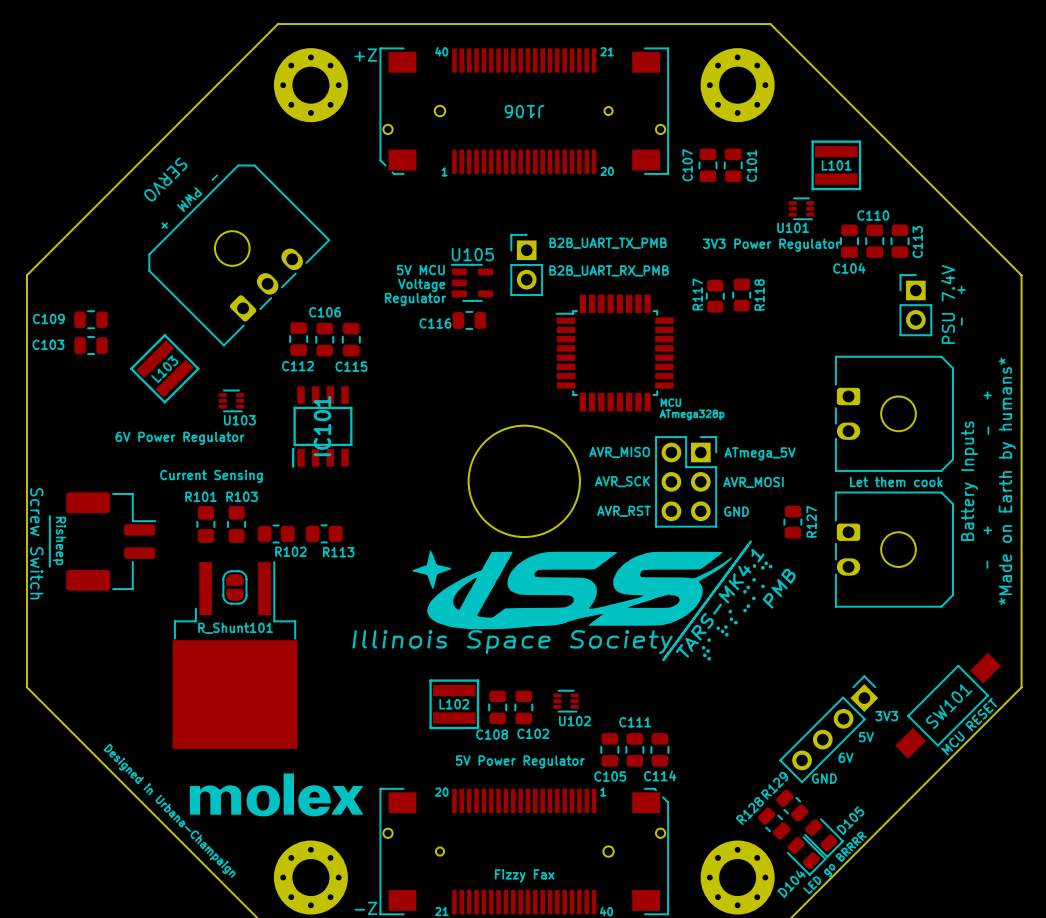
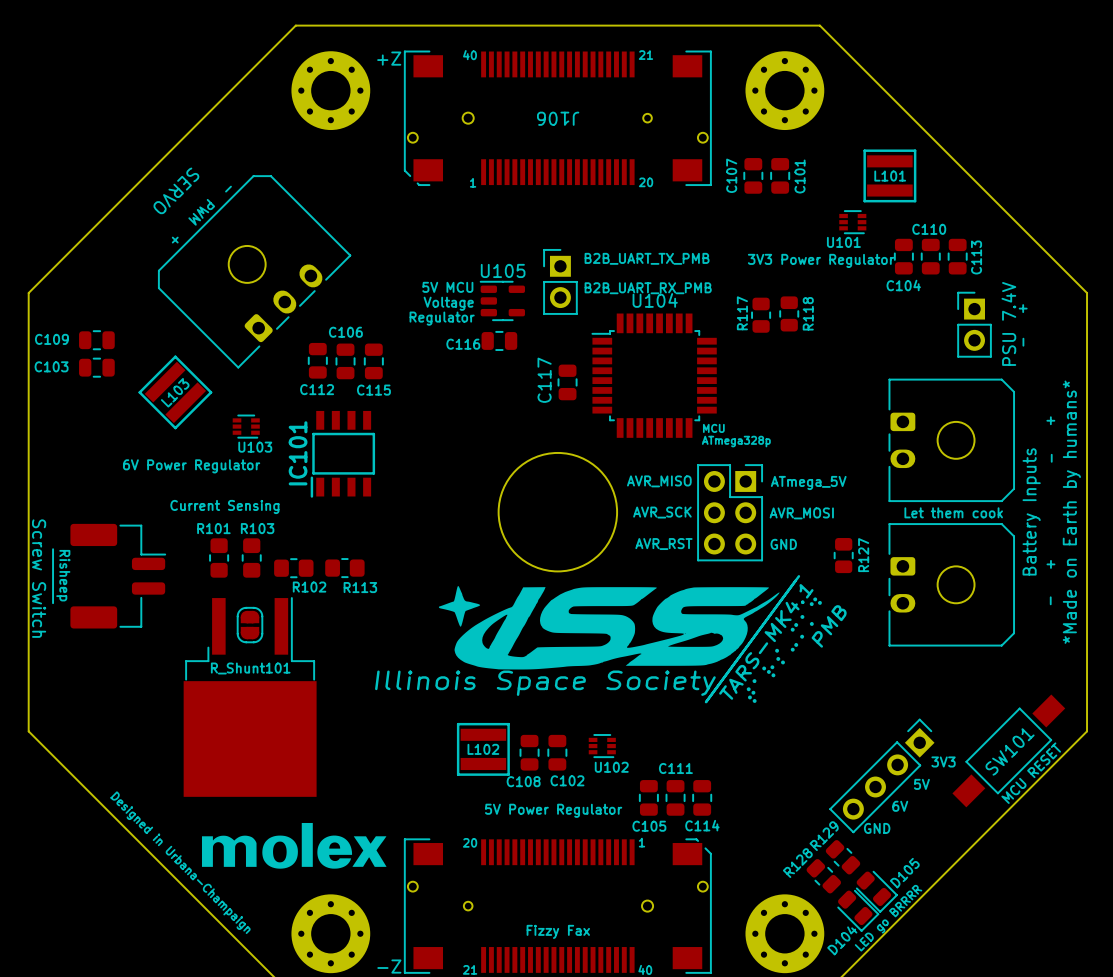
U104 name: none -> U104 (655, 300)
C117: none -> (567, 382)
IC101 name position: IC101 (322, 426) -> IC101 (298, 453)

